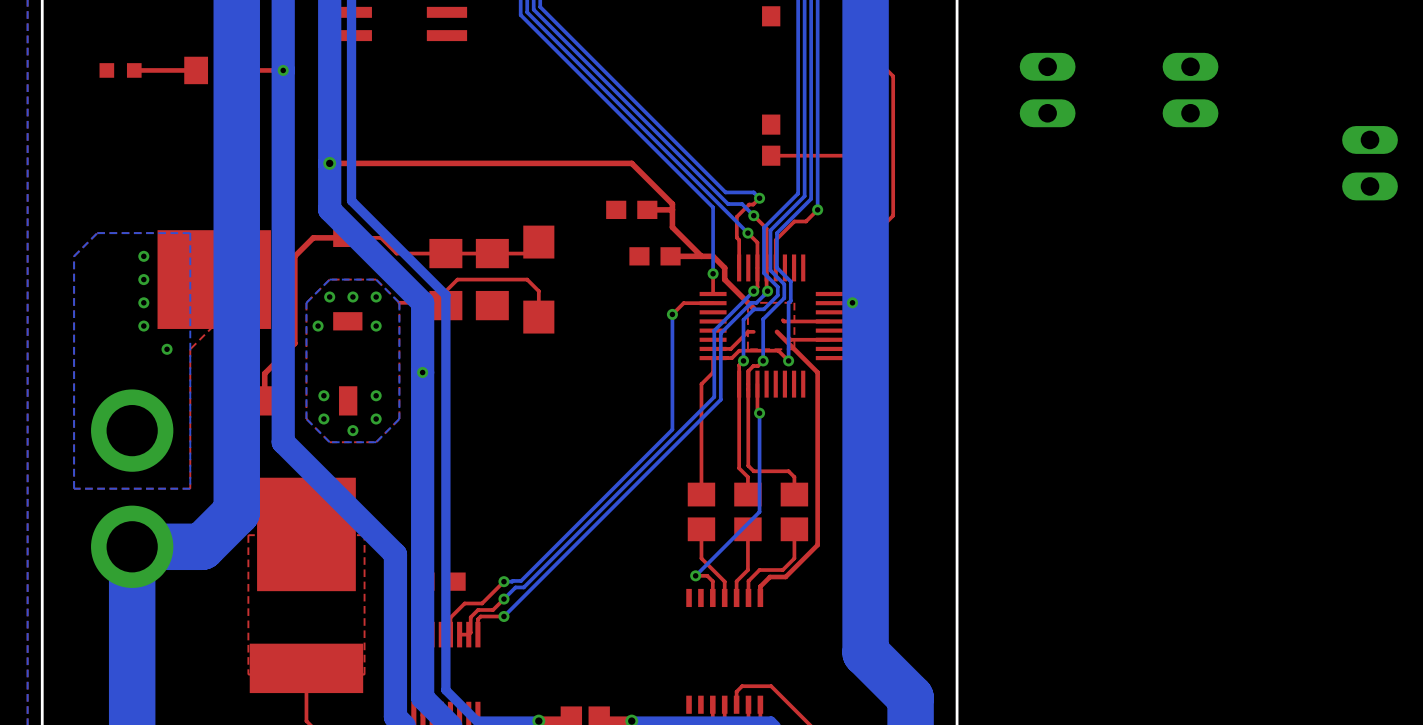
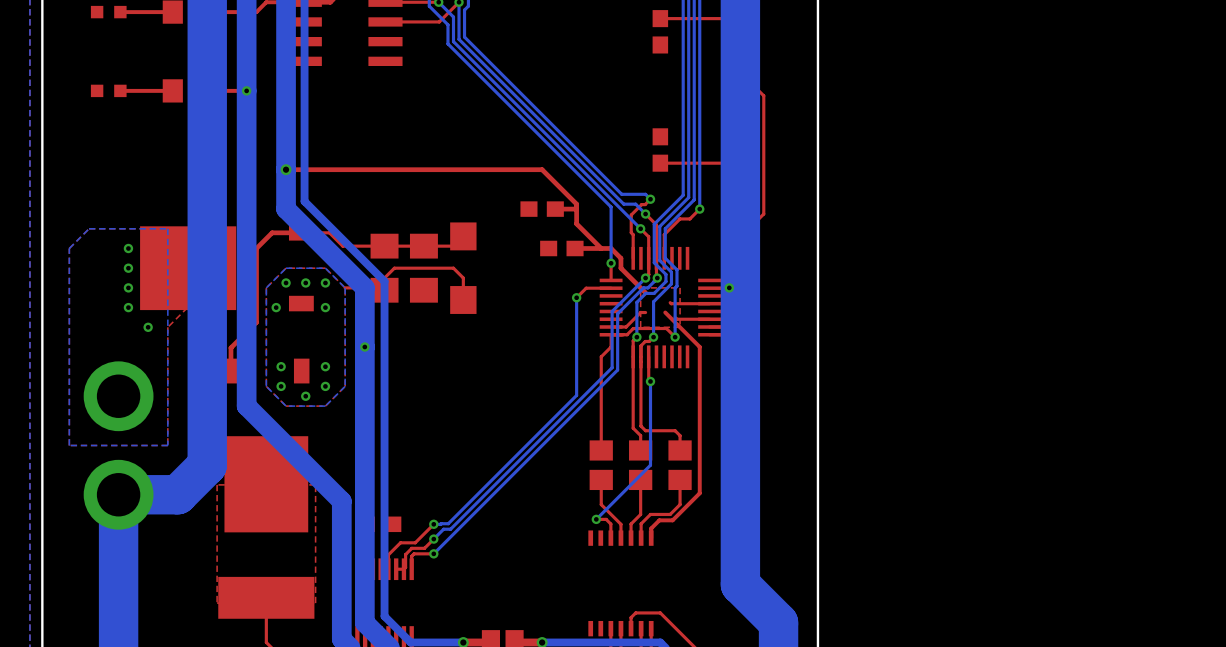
part: (1047, 90) -> none
part: (1190, 90) -> none
part: (1370, 163) -> none

